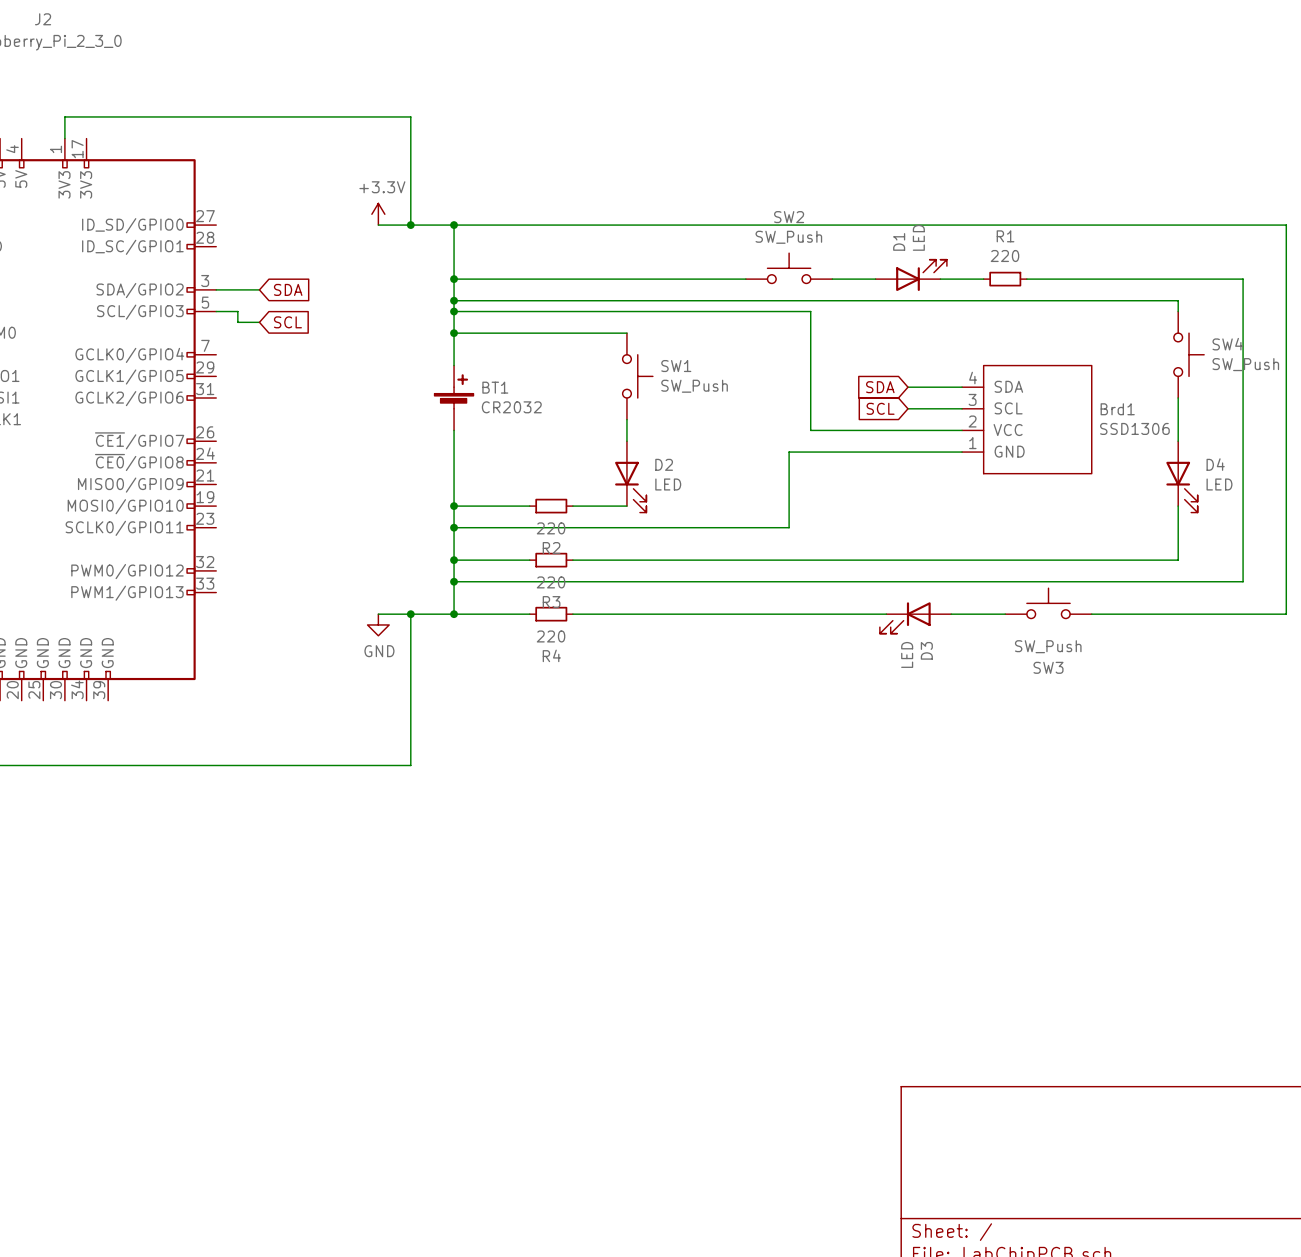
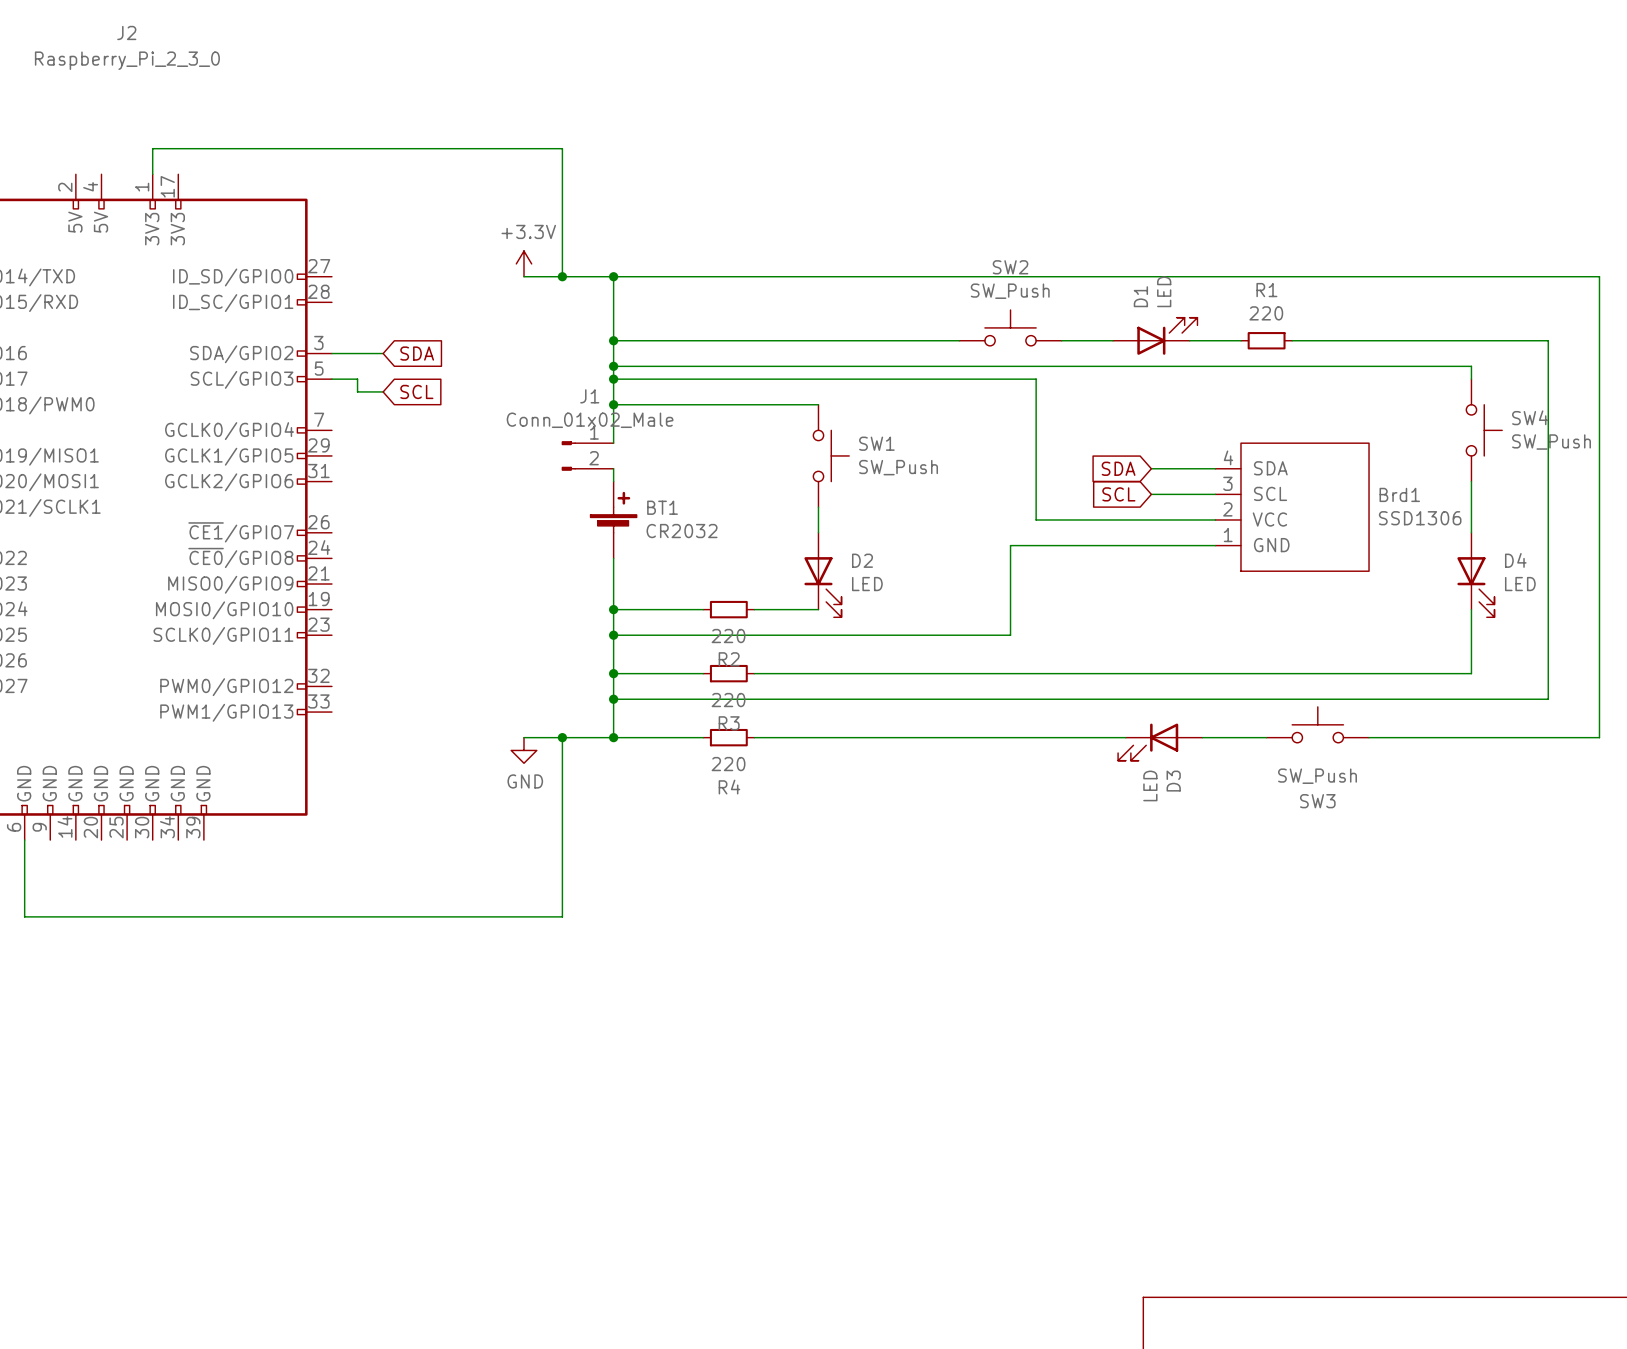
J1: none -> Conn_01x02_Male (587, 455)
BT1 position: (454, 398) -> (613, 519)

